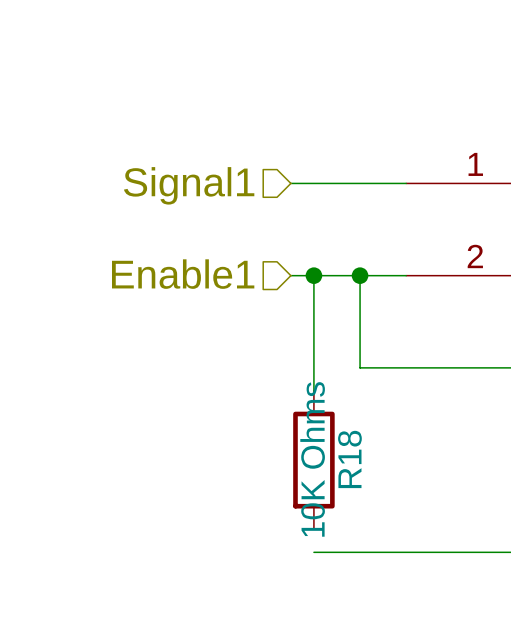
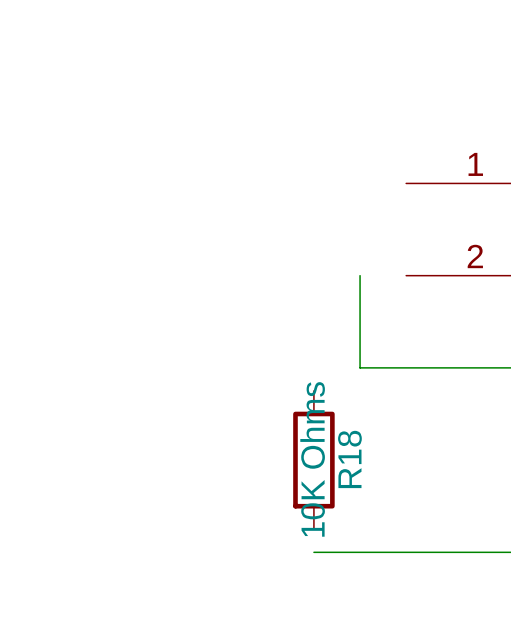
wire: (290, 183) (406, 183) -> none
hierarchical label: Signal1 (189, 185) -> none
hierarchical label: Enable1 (183, 274) -> none
wire: (290, 275) (406, 275) -> none
wire: (313, 275) (313, 390) -> none
junction: (313, 275) -> none
junction: (360, 275) -> none

